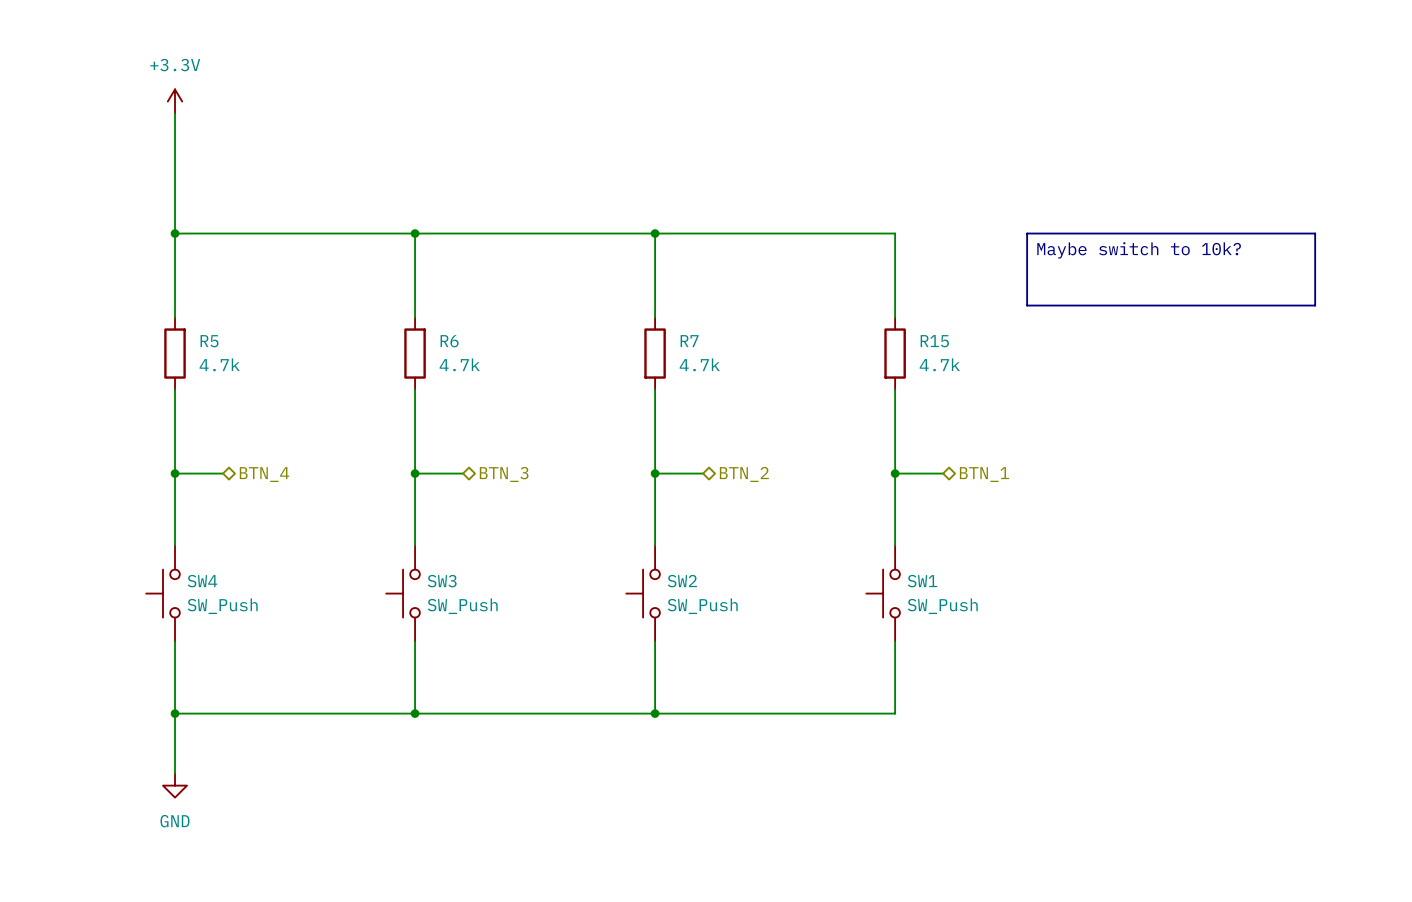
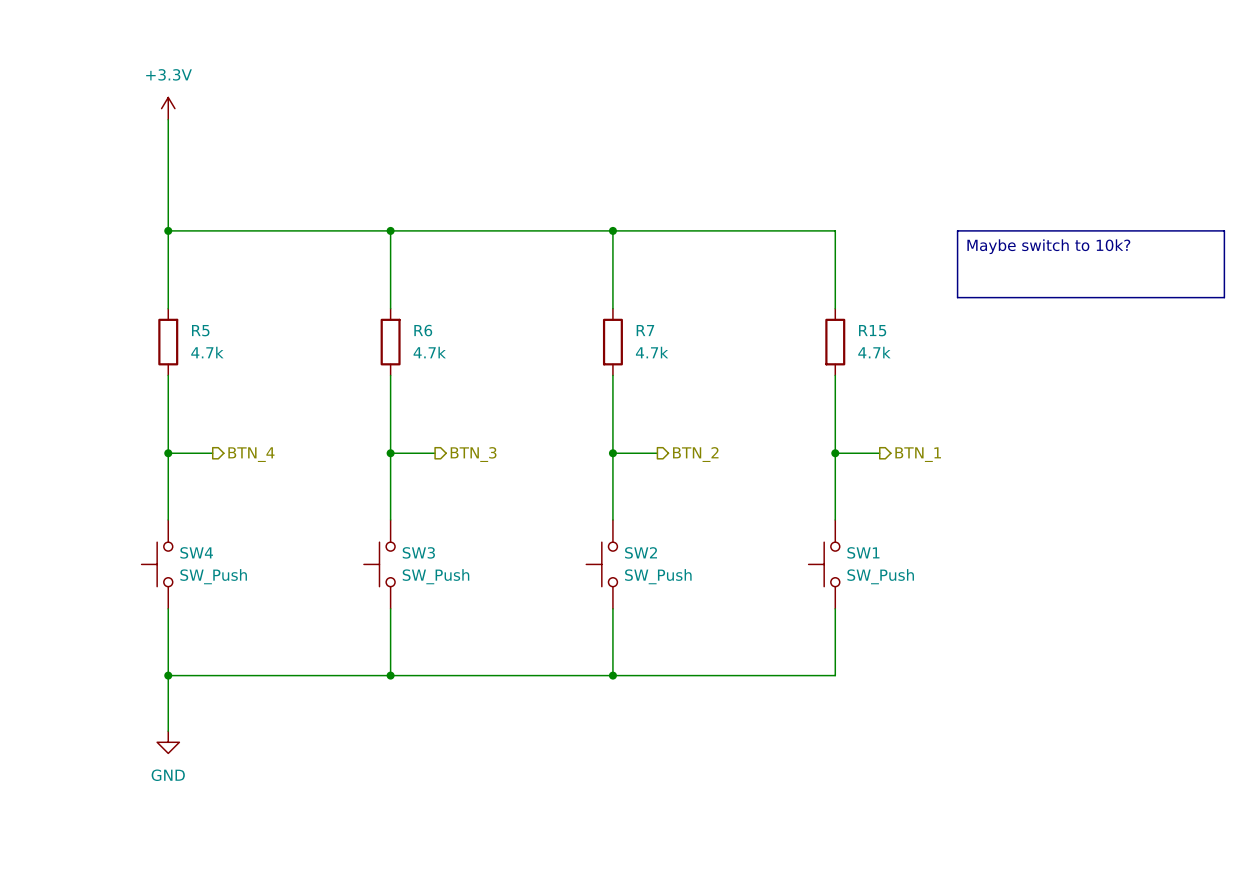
hierarchical label shape: bidirectional (264, 474) -> output (251, 454)
hierarchical label shape: bidirectional (504, 474) -> output (473, 454)
hierarchical label shape: bidirectional (744, 474) -> output (695, 454)
hierarchical label shape: bidirectional (984, 474) -> output (918, 454)

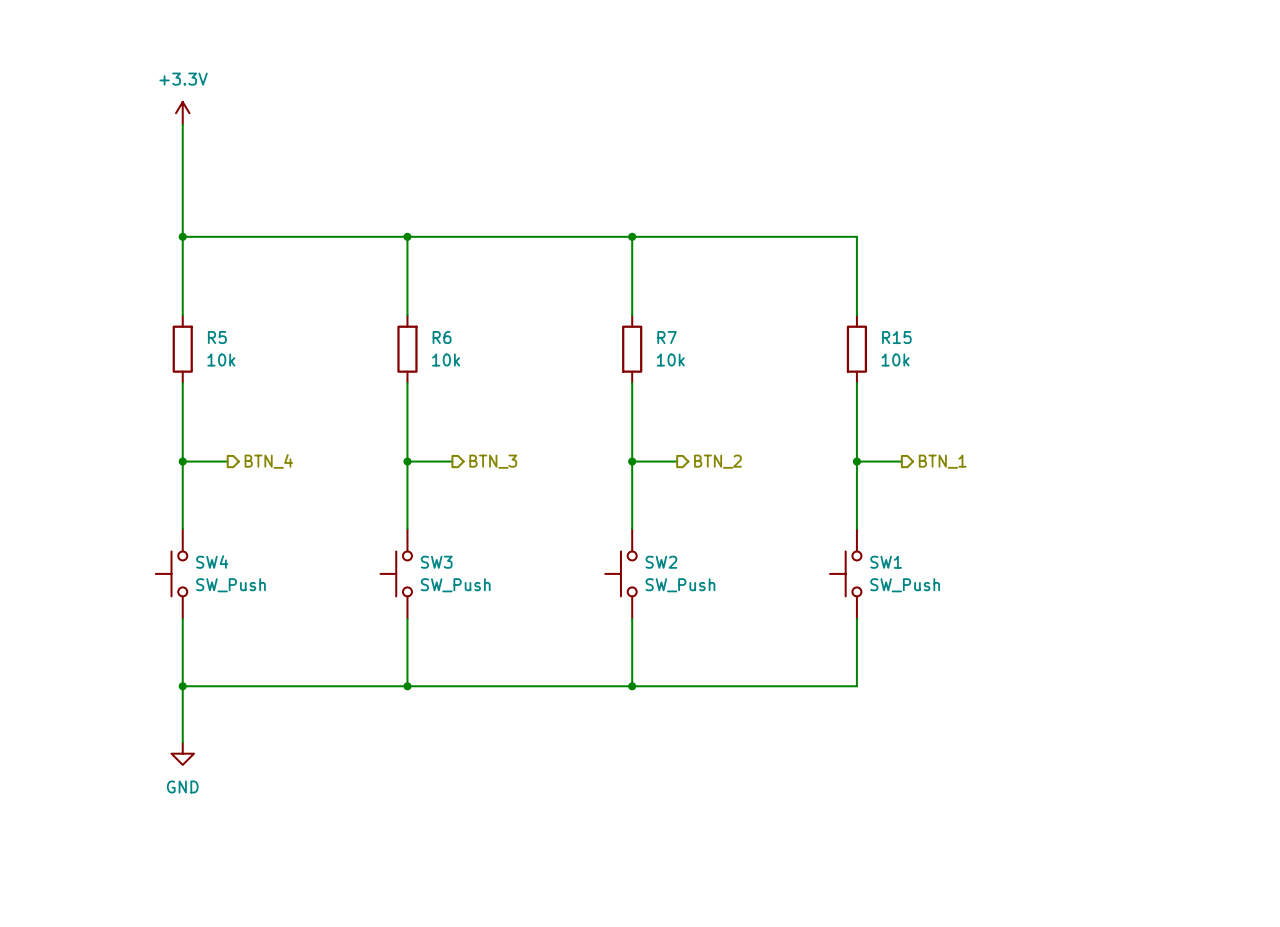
line: (957, 230) (1224, 230) (1224, 297) (957, 297) (957, 230) -> none
text: Maybe switch to 10k? (1048, 246) -> none
R5 value: 4.7k (207, 352) -> 10k (221, 360)
R6 value: 4.7k (429, 352) -> 10k (446, 360)
R7 value: 4.7k (652, 352) -> 10k (670, 360)
R15 value: 4.7k (874, 352) -> 10k (895, 360)

